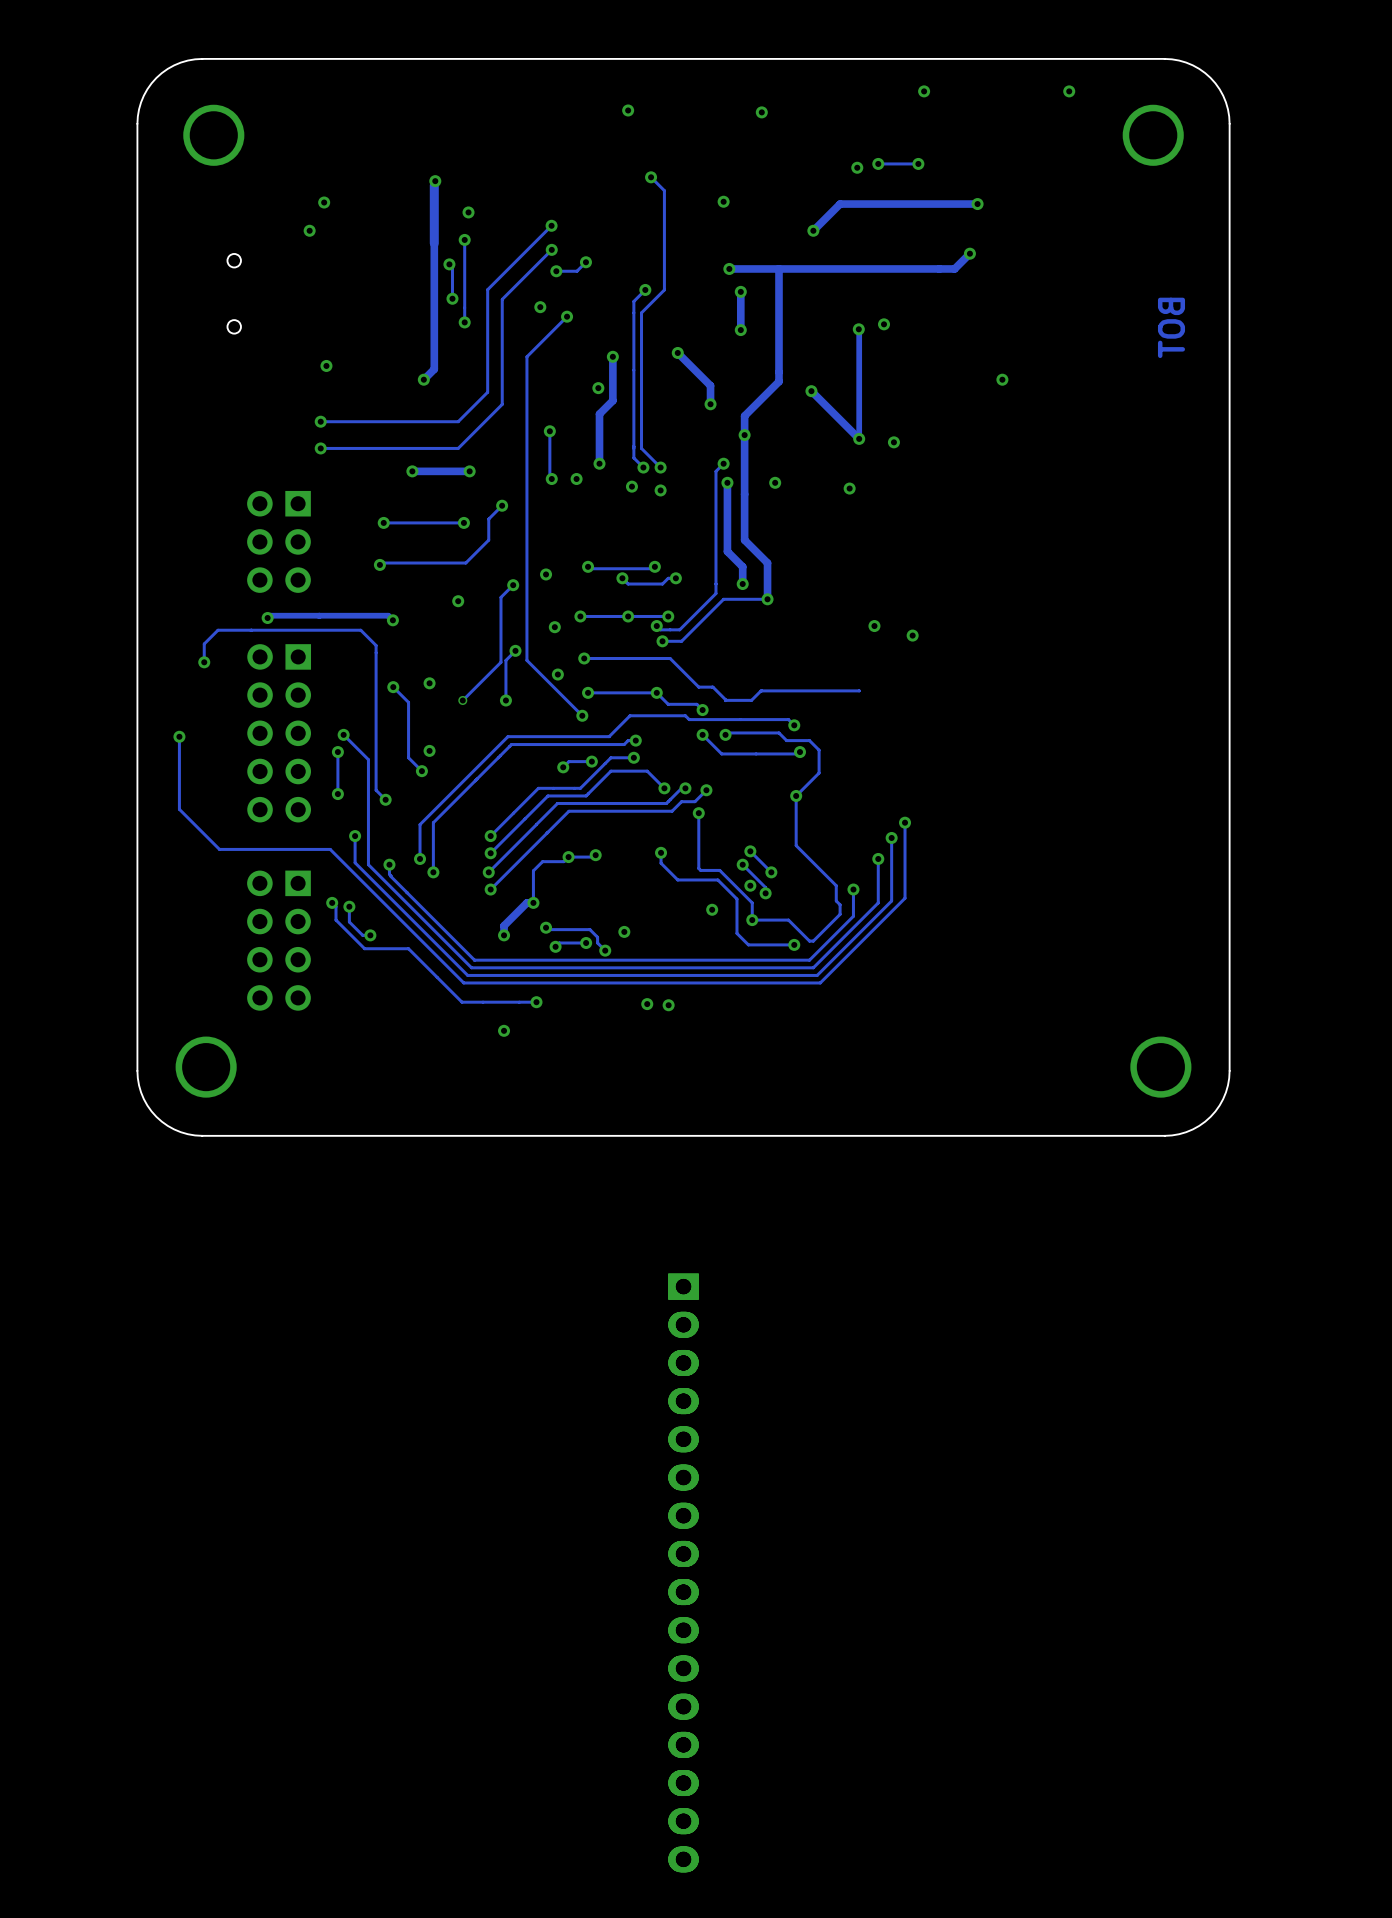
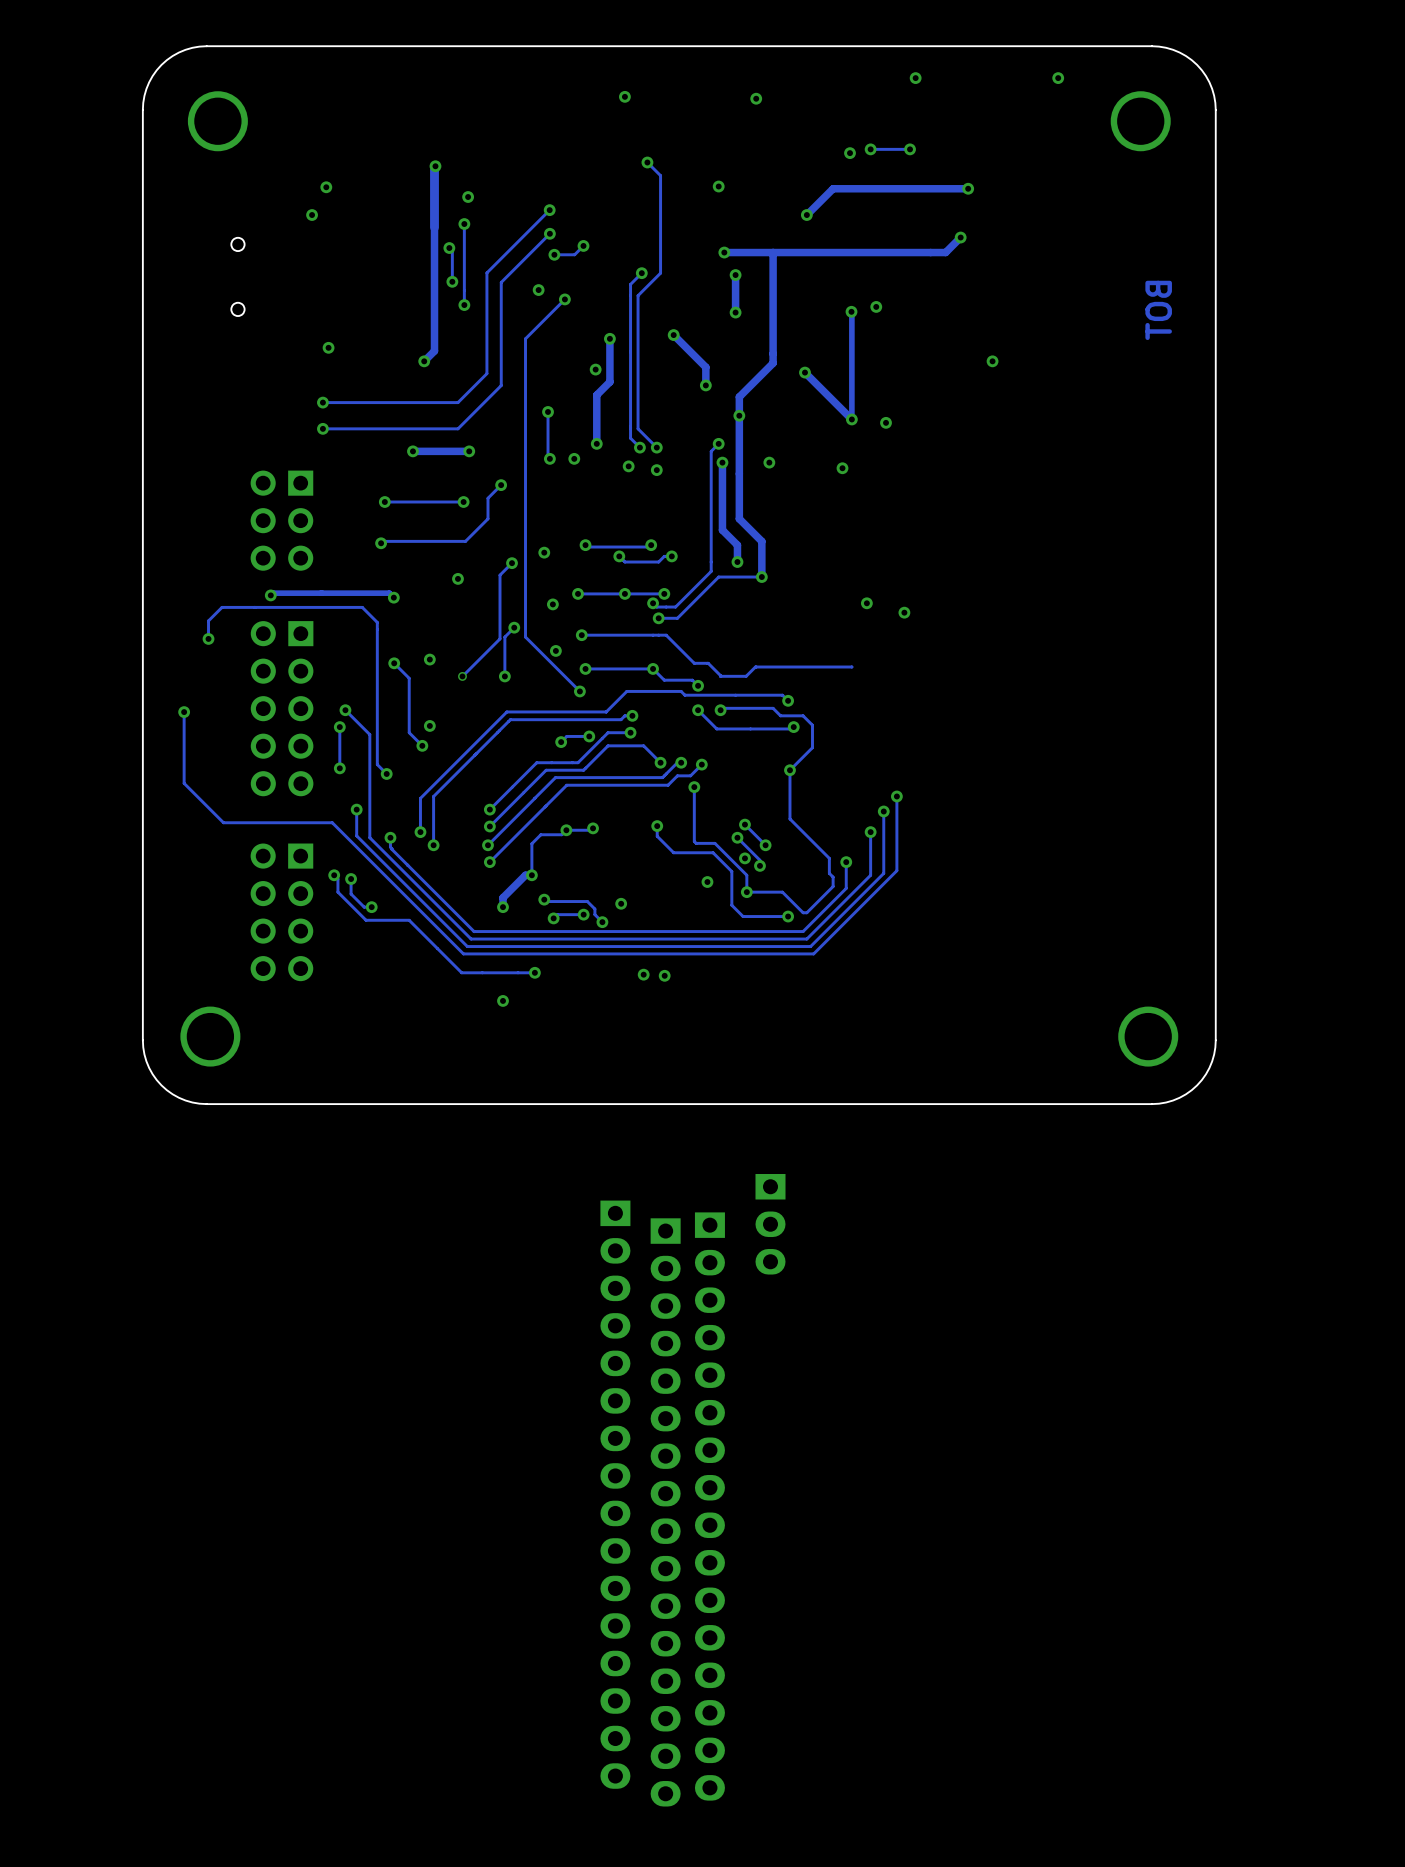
part: none -> (770, 1224)
part: none -> (615, 1494)
part: none -> (709, 1506)
part: none -> (665, 1512)
part: (683, 1573) -> none

